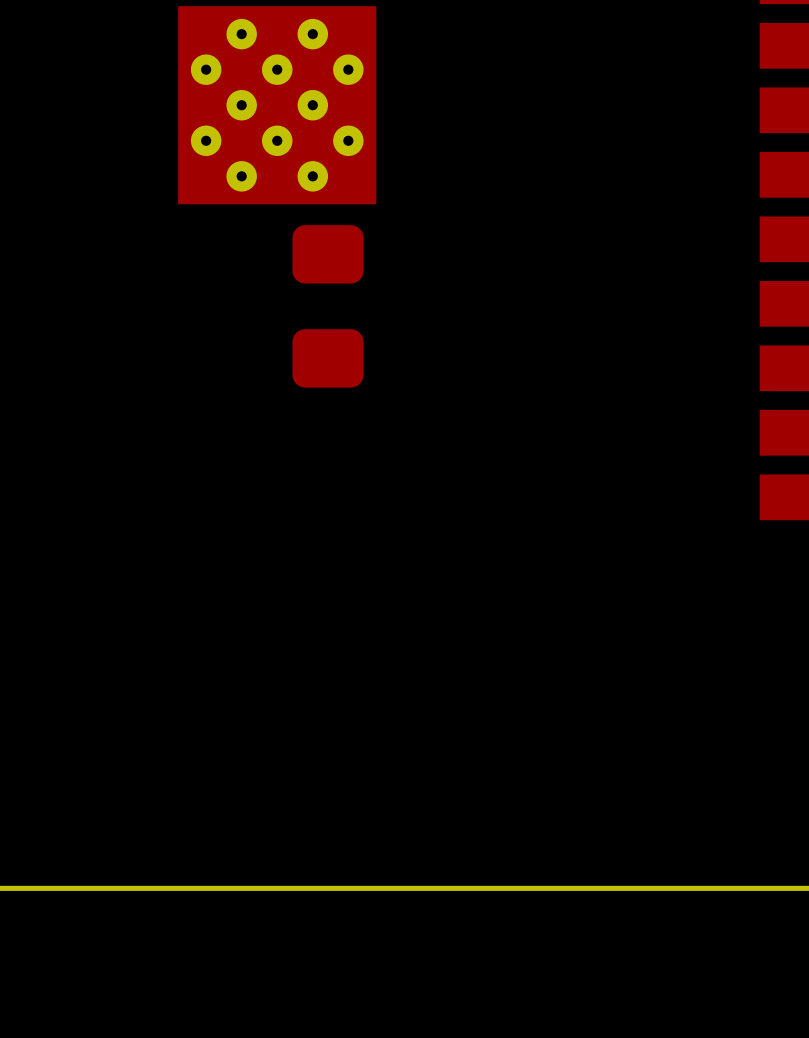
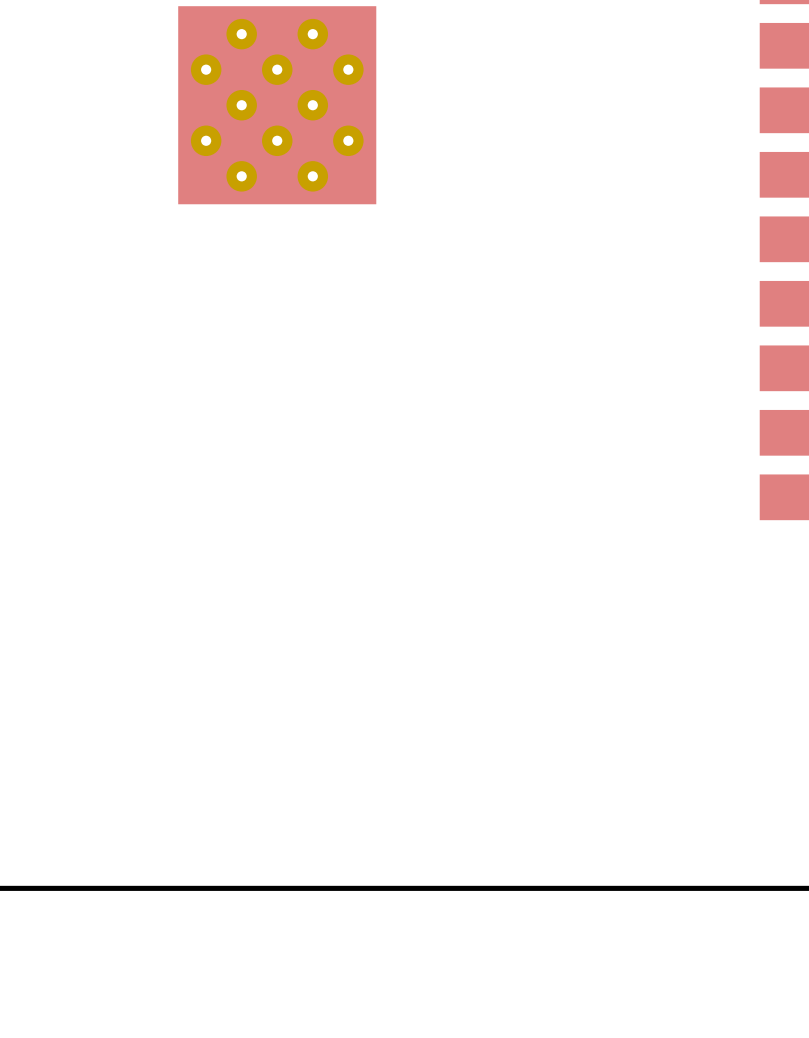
part: (328, 306) -> none

